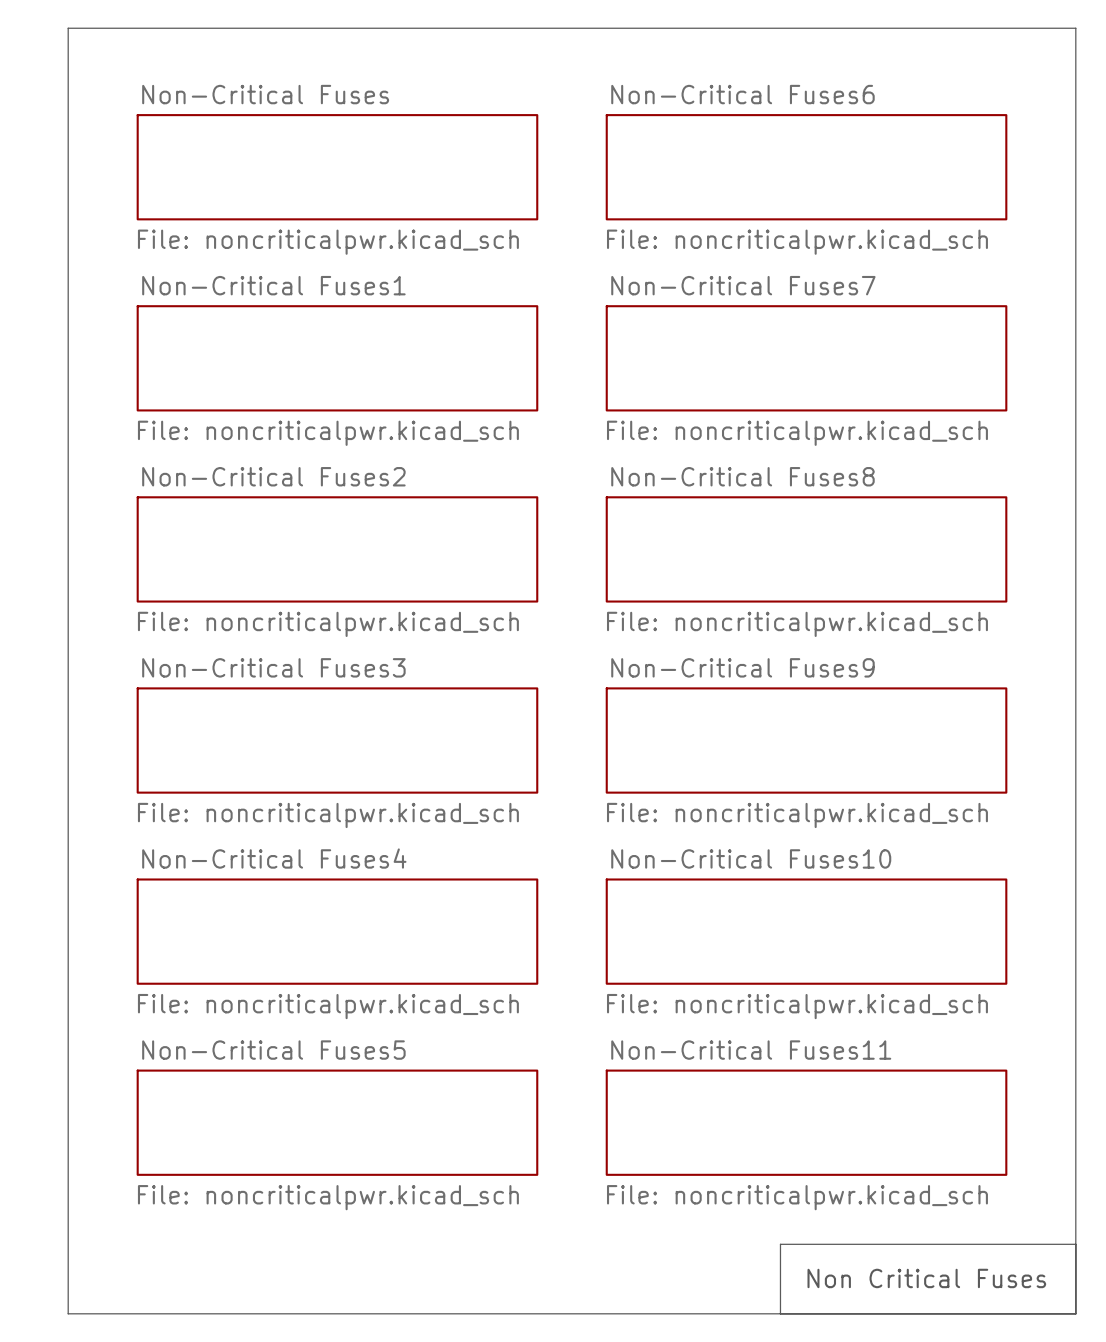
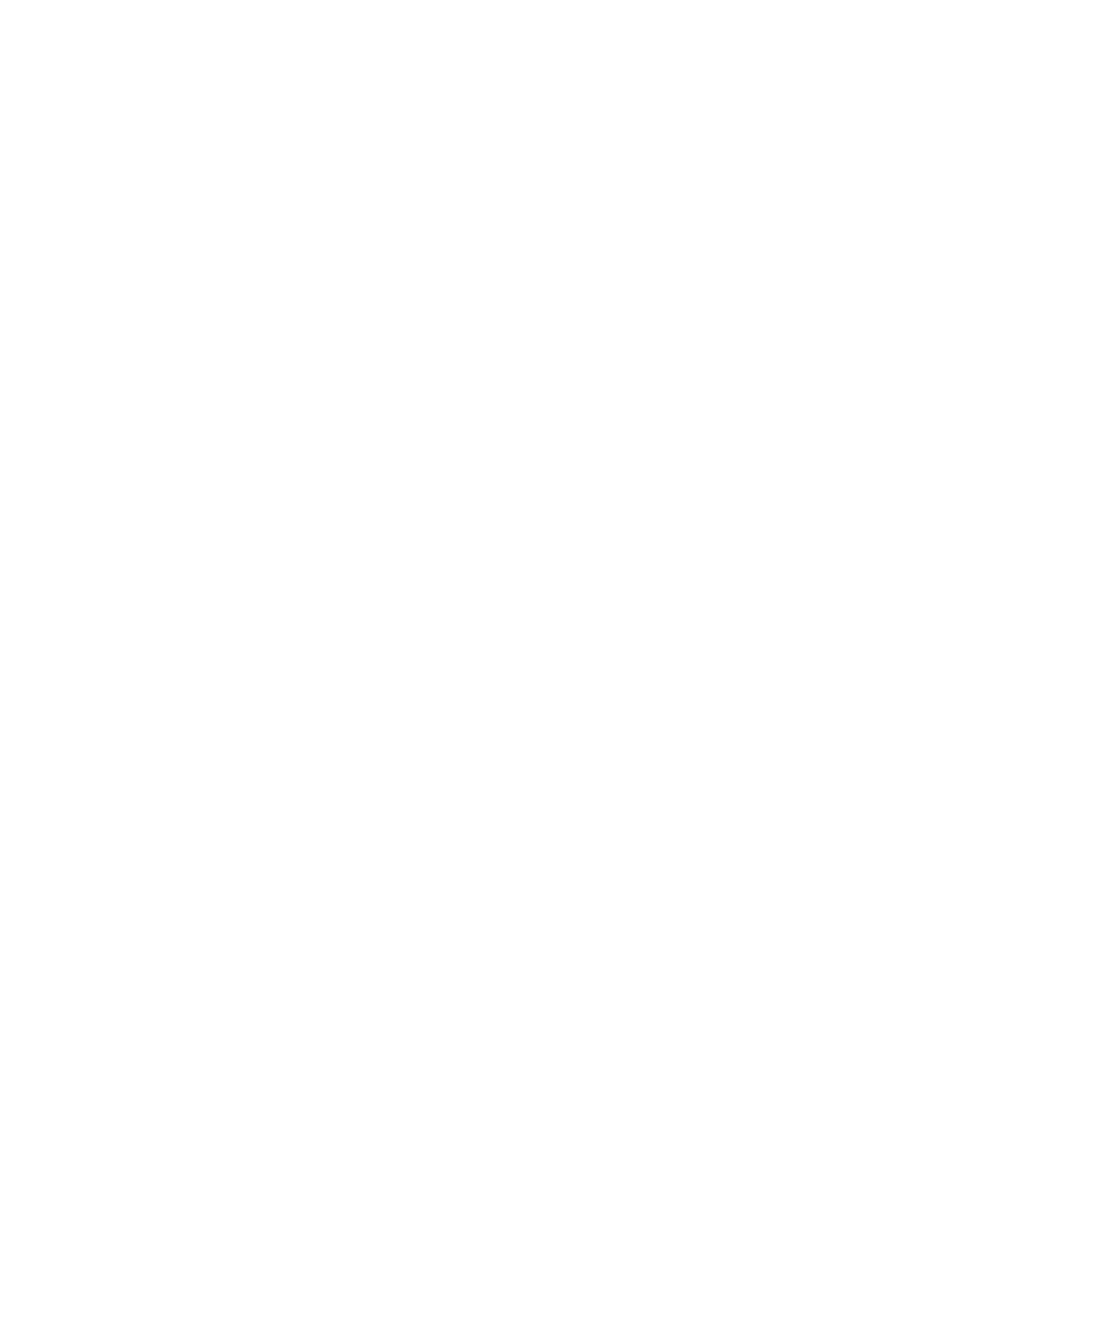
line: (68, 28) (1075, 28) (1075, 1313) (68, 1313) (68, 28) -> none
sheet Non-Critical Fuses: File: noncriticalpwr.kicad_sch (337, 167) -> none
sheet Non-Critical Fuses6: File: noncriticalpwr.kicad_sch (806, 167) -> none
sheet Non-Critical Fuses1: File: noncriticalpwr.kicad_sch (337, 358) -> none
sheet Non-Critical Fuses7: File: noncriticalpwr.kicad_sch (806, 358) -> none
sheet Non-Critical Fuses2: File: noncriticalpwr.kicad_sch (337, 549) -> none
sheet Non-Critical Fuses8: File: noncriticalpwr.kicad_sch (806, 549) -> none
sheet Non-Critical Fuses3: File: noncriticalpwr.kicad_sch (337, 740) -> none
sheet Non-Critical Fuses9: File: noncriticalpwr.kicad_sch (806, 740) -> none
sheet Non-Critical Fuses4: File: noncriticalpwr.kicad_sch (337, 931) -> none
sheet Non-Critical Fuses10: File: noncriticalpwr.kicad_sch (806, 931) -> none
sheet Non-Critical Fuses5: File: noncriticalpwr.kicad_sch (337, 1122) -> none
sheet Non-Critical Fuses11: File: noncriticalpwr.kicad_sch (806, 1122) -> none
line: (1075, 1244) (780, 1244) (780, 1313) -> none
text: Non Critical Fuses (926, 1278) -> none

